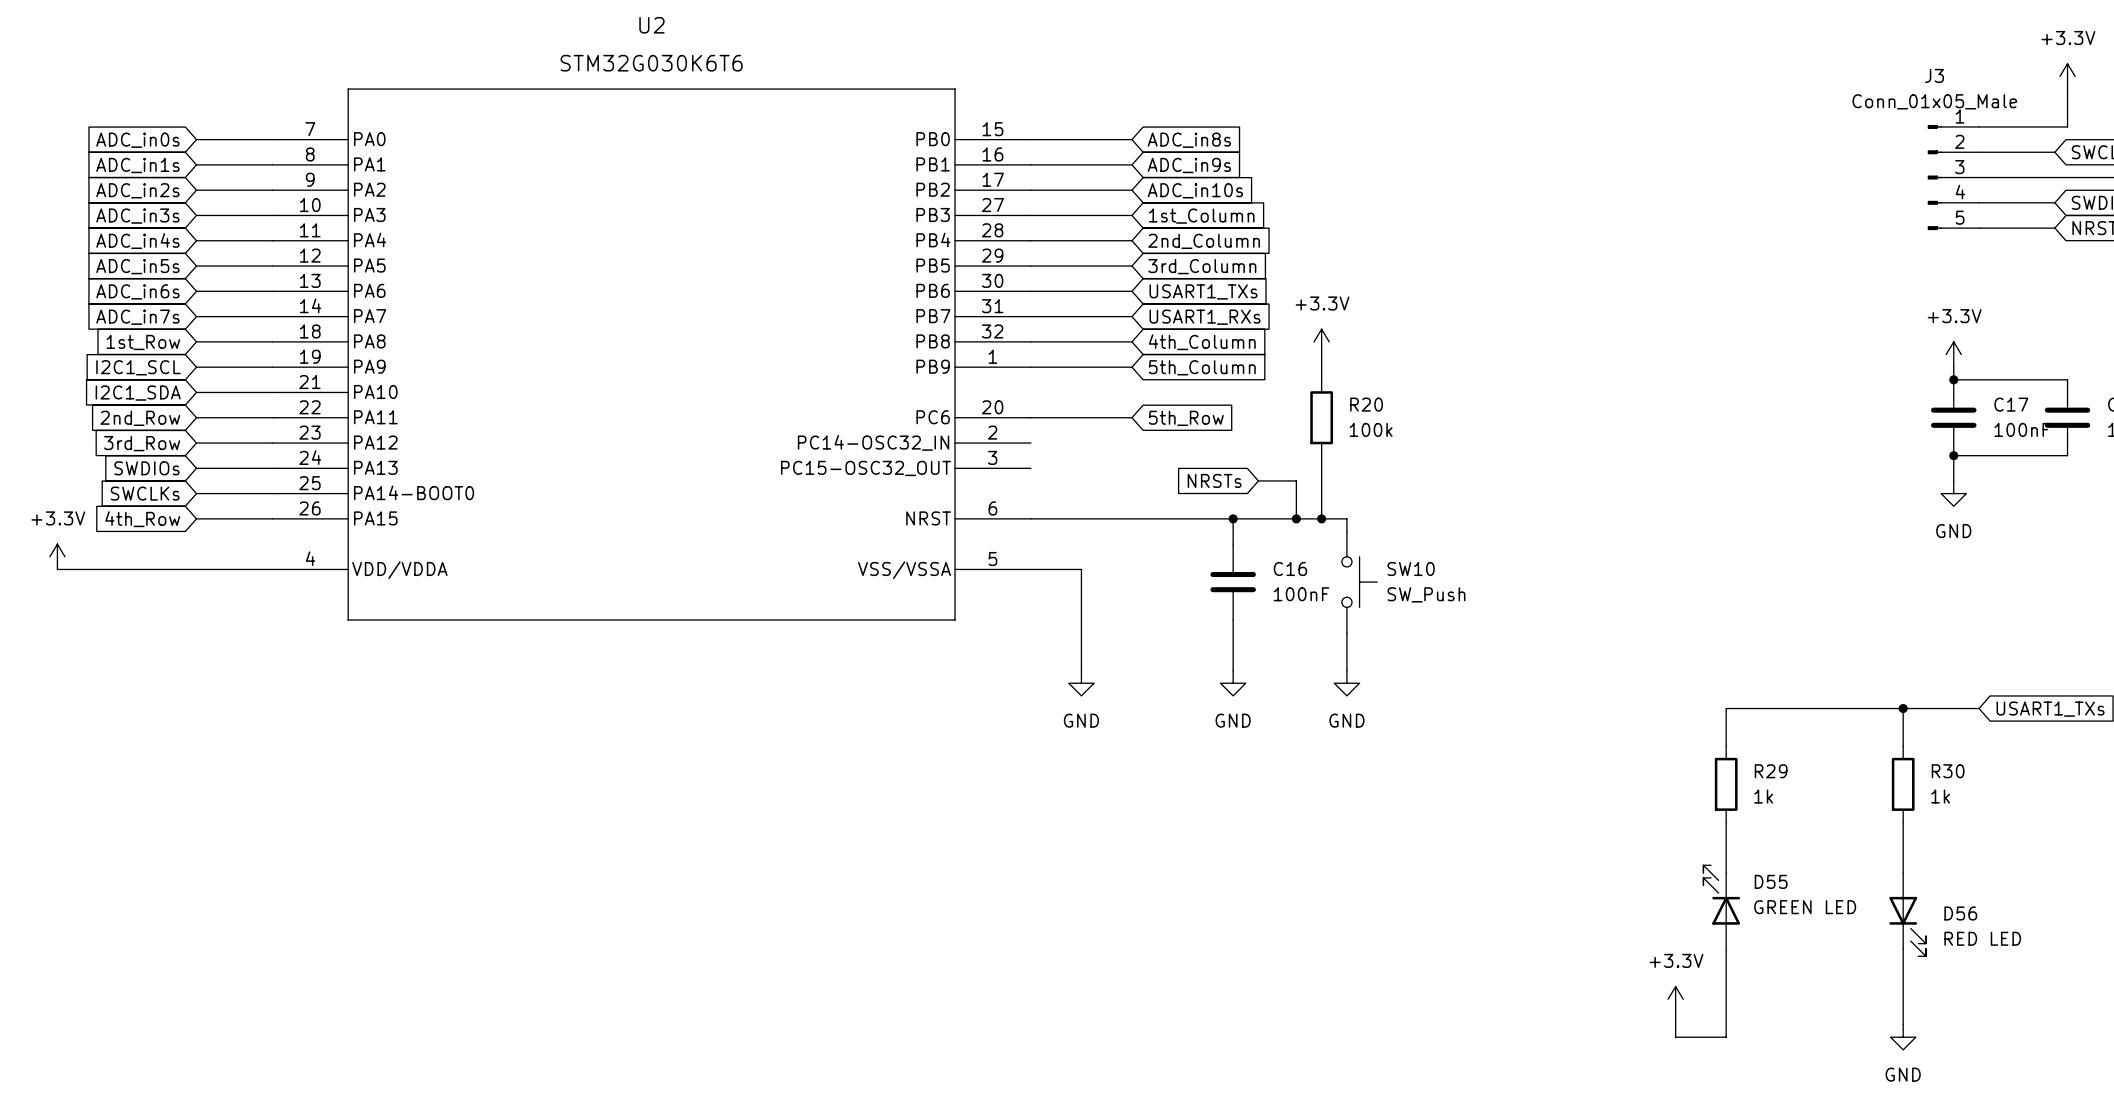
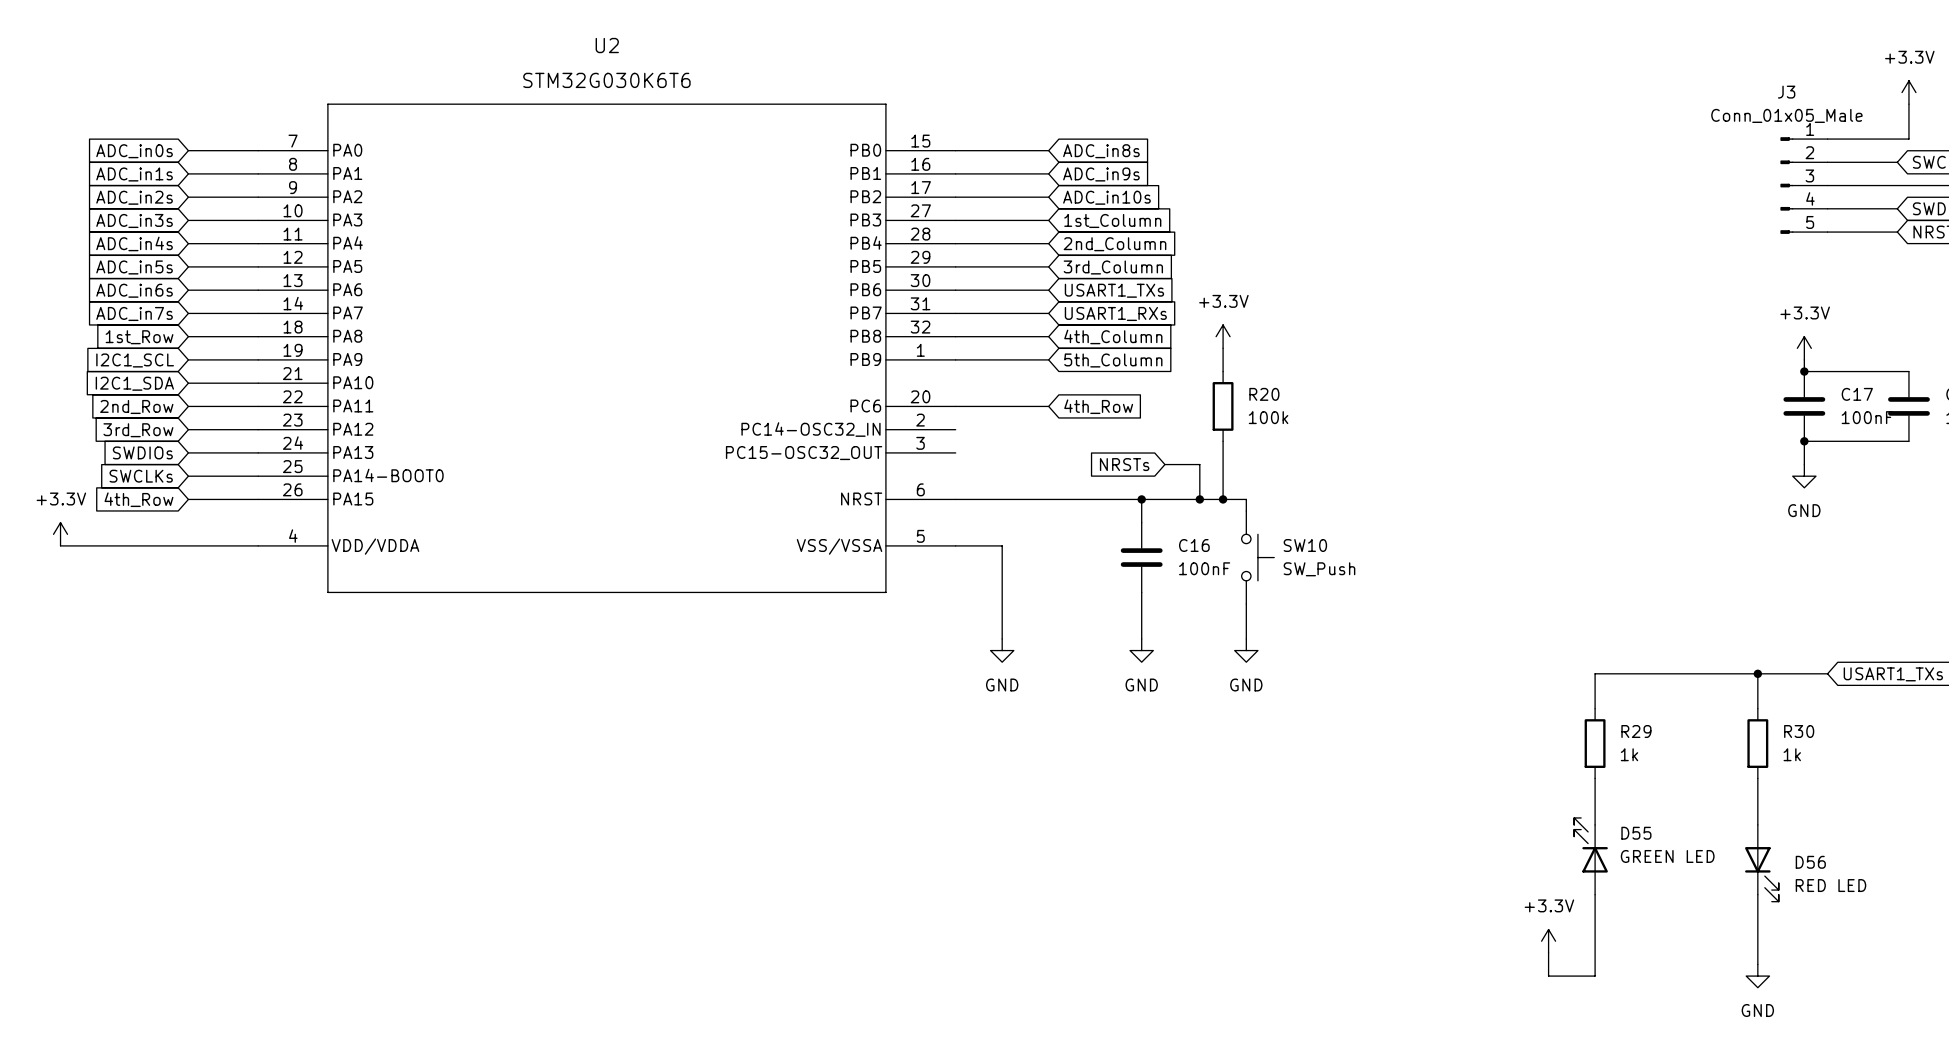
global label: 5th_Row (1186, 418) -> 4th_Row (1098, 406)

